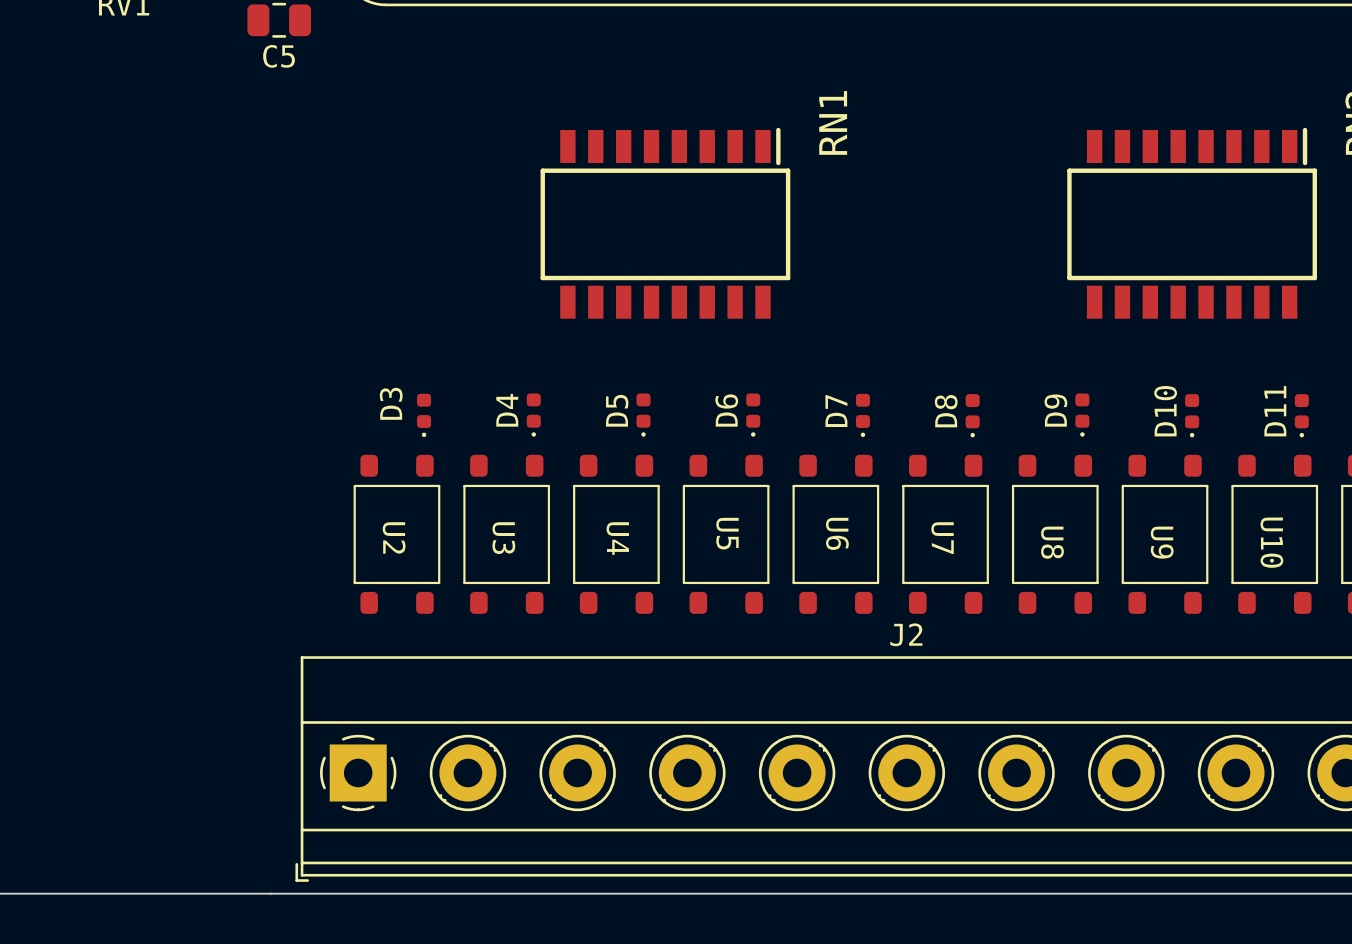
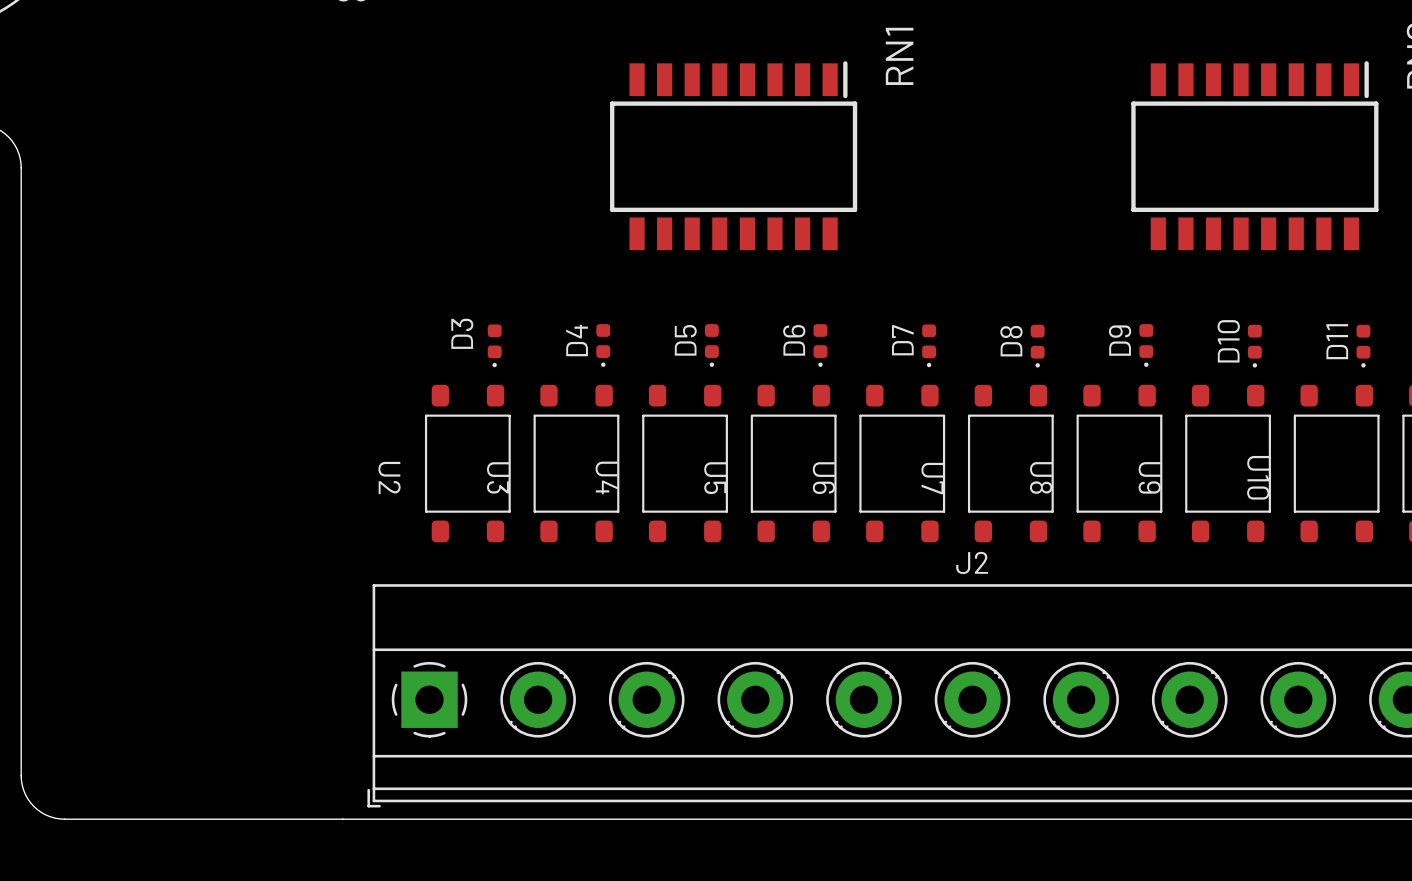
U5 name position: U5 (727, 533) -> U5 (715, 478)
U6 name position: U6 (837, 533) -> U6 (823, 478)
U2 name position: U2 (394, 537) -> U2 (389, 477)
U3 name position: U3 (503, 538) -> U3 (497, 477)
U4 name position: U4 (617, 538) -> U4 (606, 477)
U7 name position: U7 (942, 538) -> U7 (932, 478)
U8 name position: U8 (1052, 542) -> U8 (1041, 477)
U9 name position: U9 (1162, 542) -> U9 (1149, 477)
U10 name position: U10 (1271, 542) -> U10 (1258, 477)

